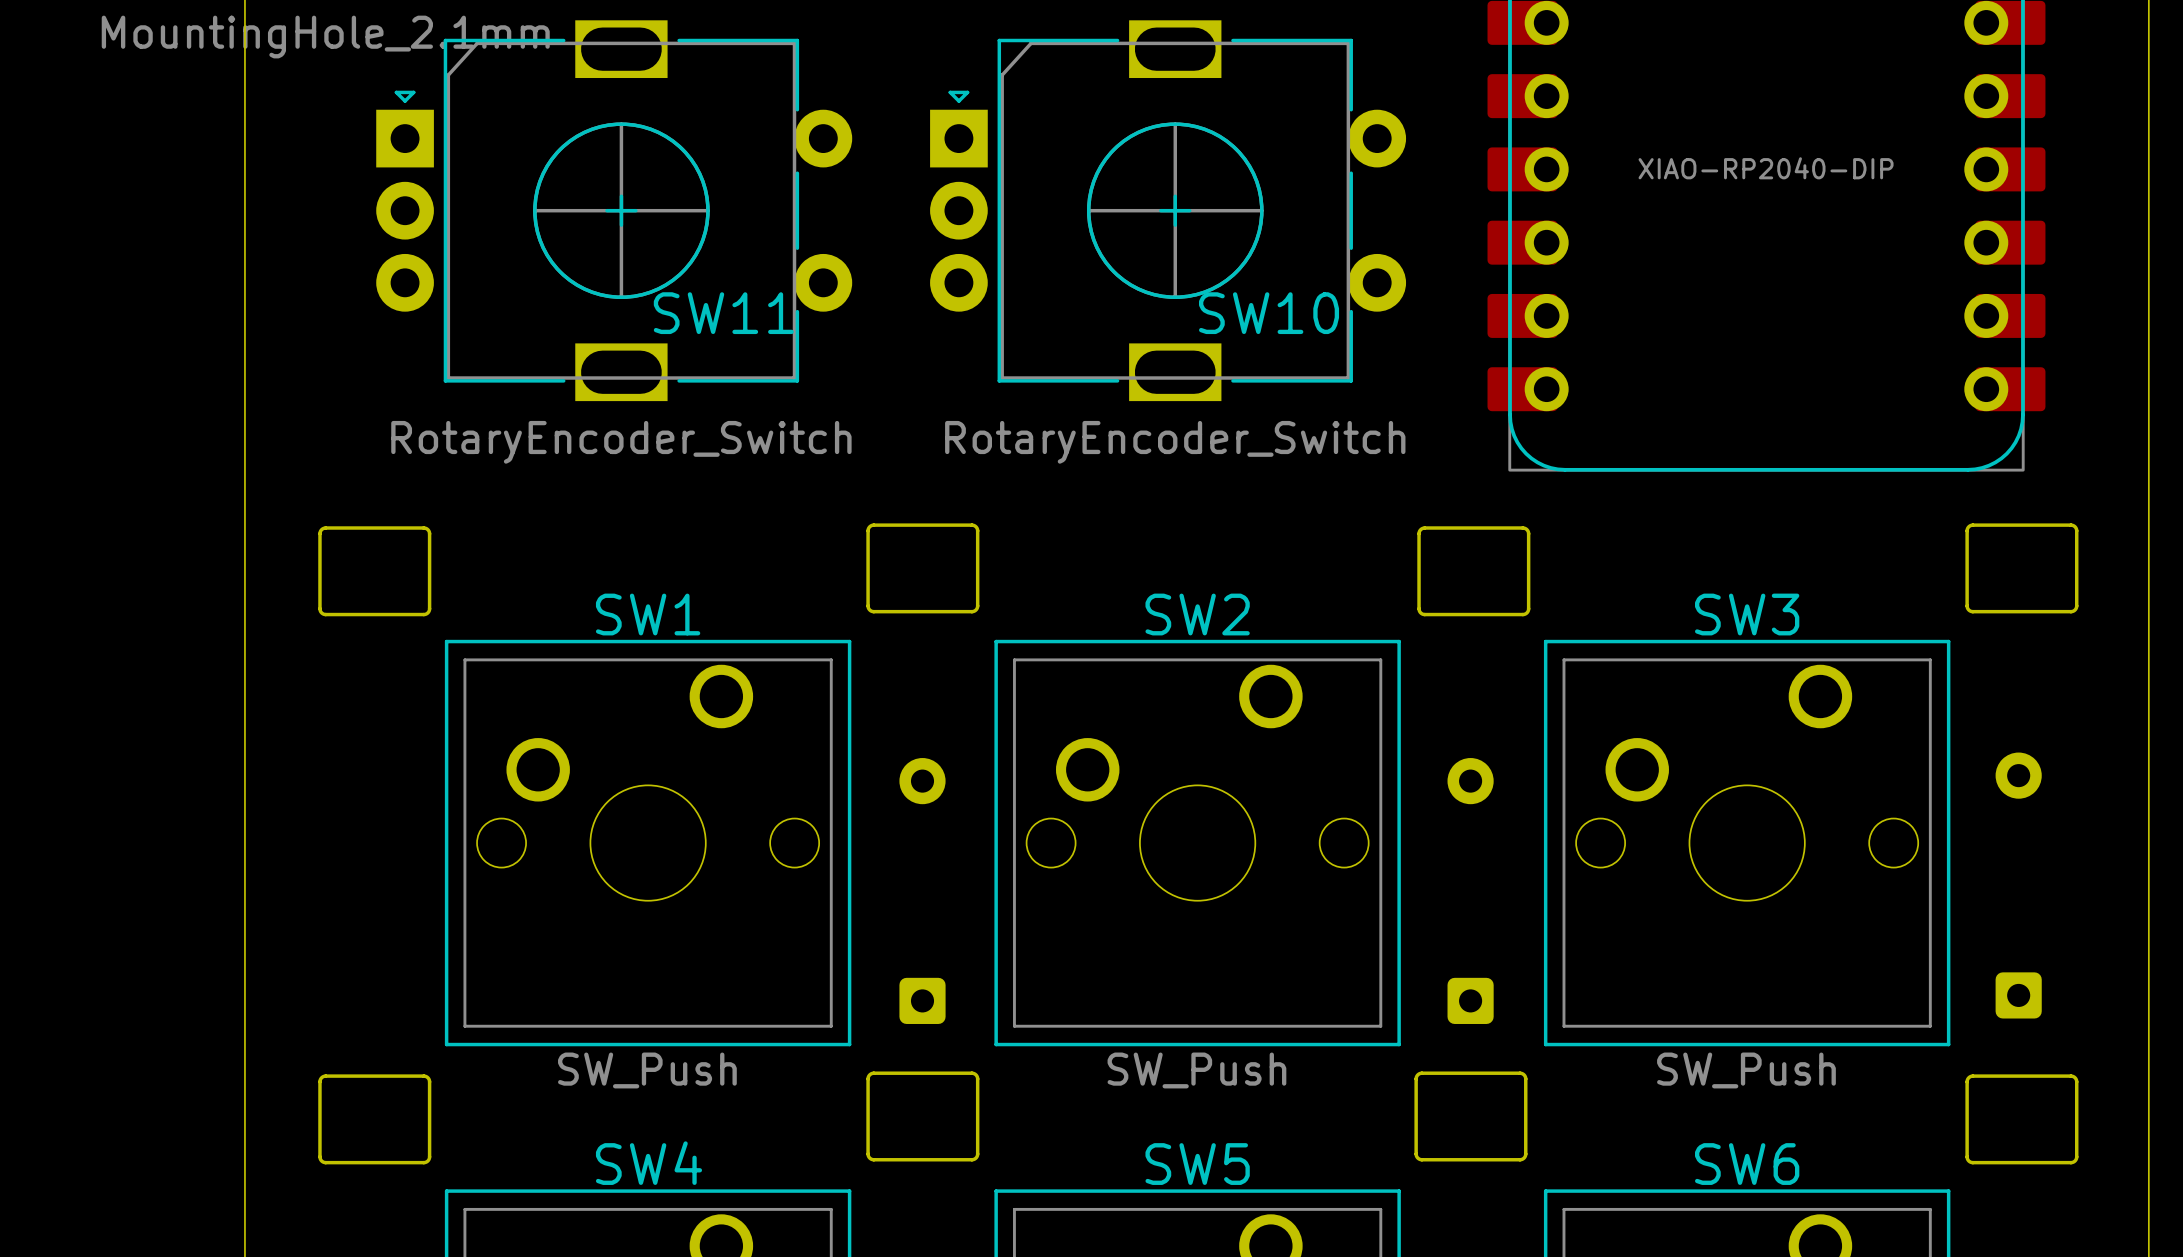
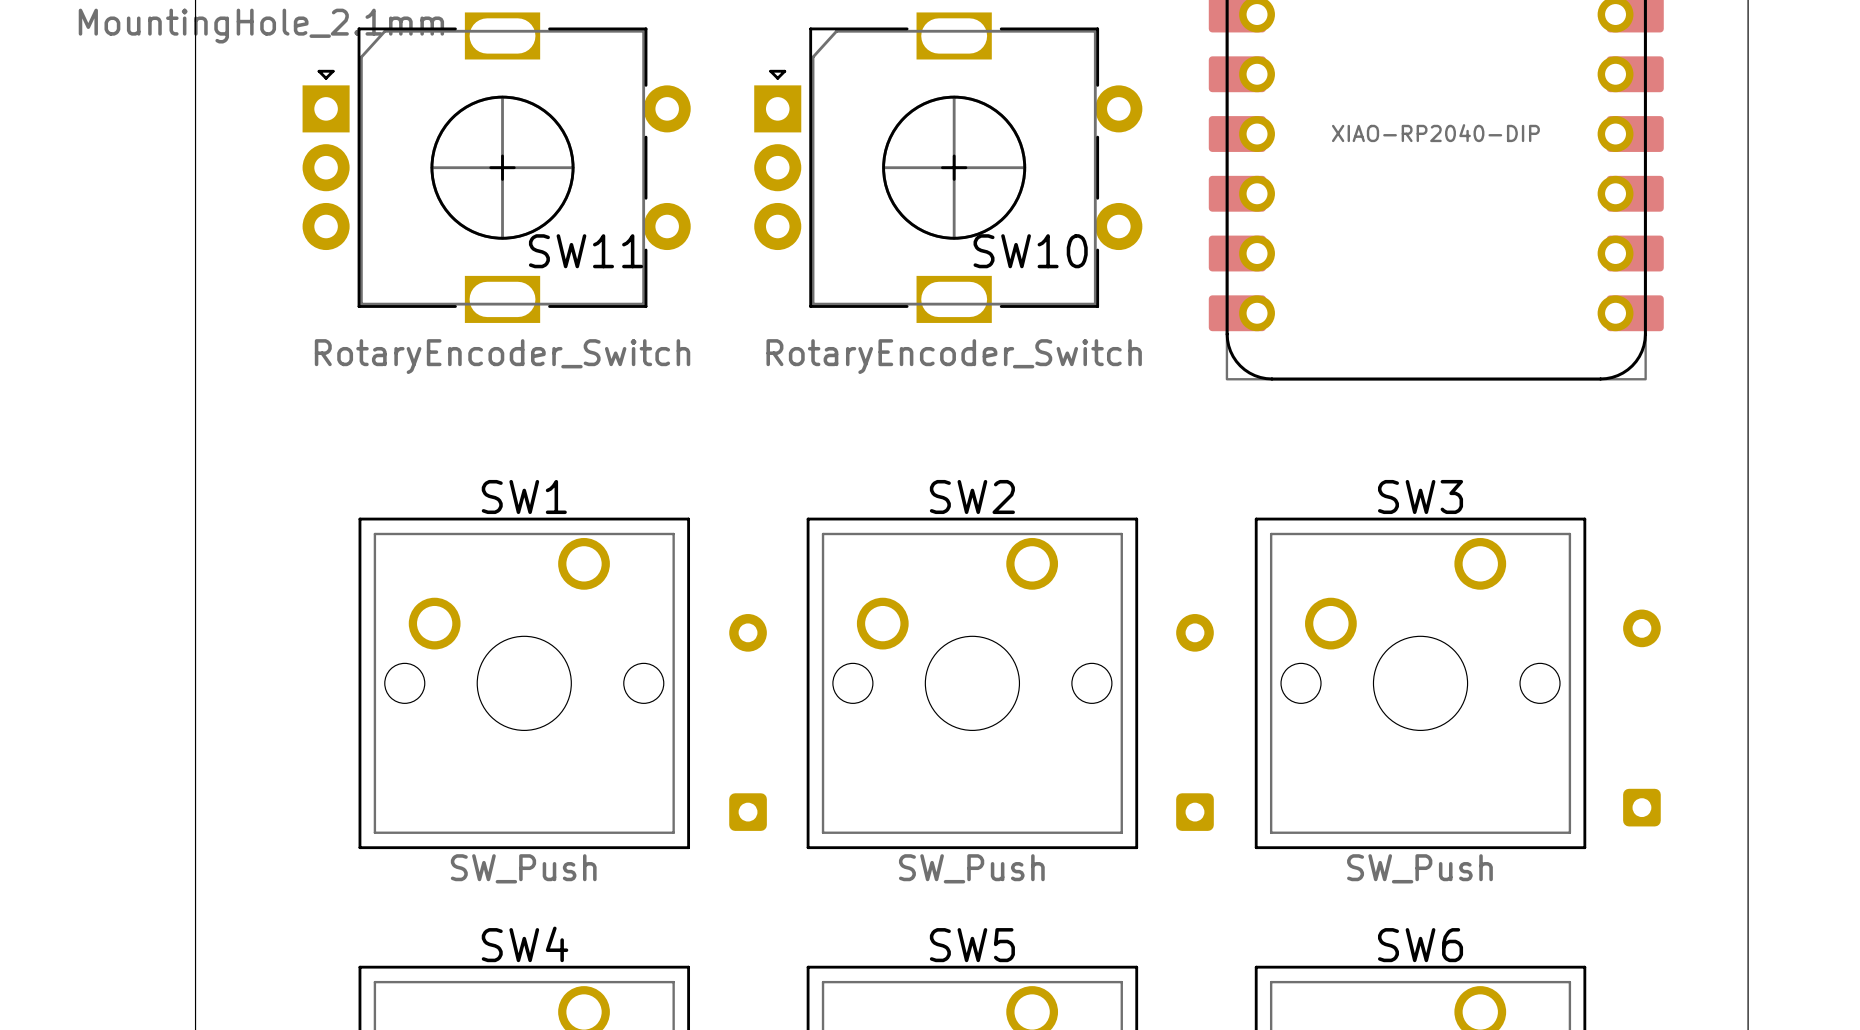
part: (922, 568) -> none
part: (2021, 568) -> none
part: (374, 571) -> none
part: (1473, 571) -> none
part: (922, 1116) -> none
part: (1470, 1116) -> none
part: (374, 1119) -> none
part: (2021, 1119) -> none

